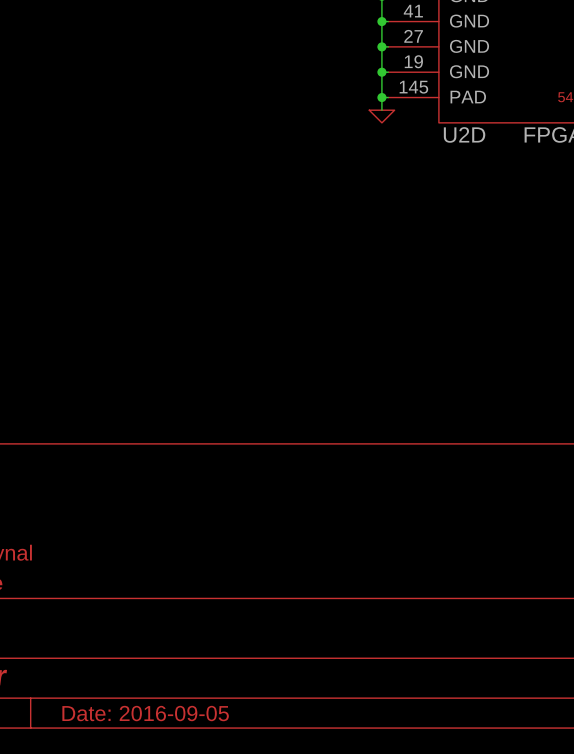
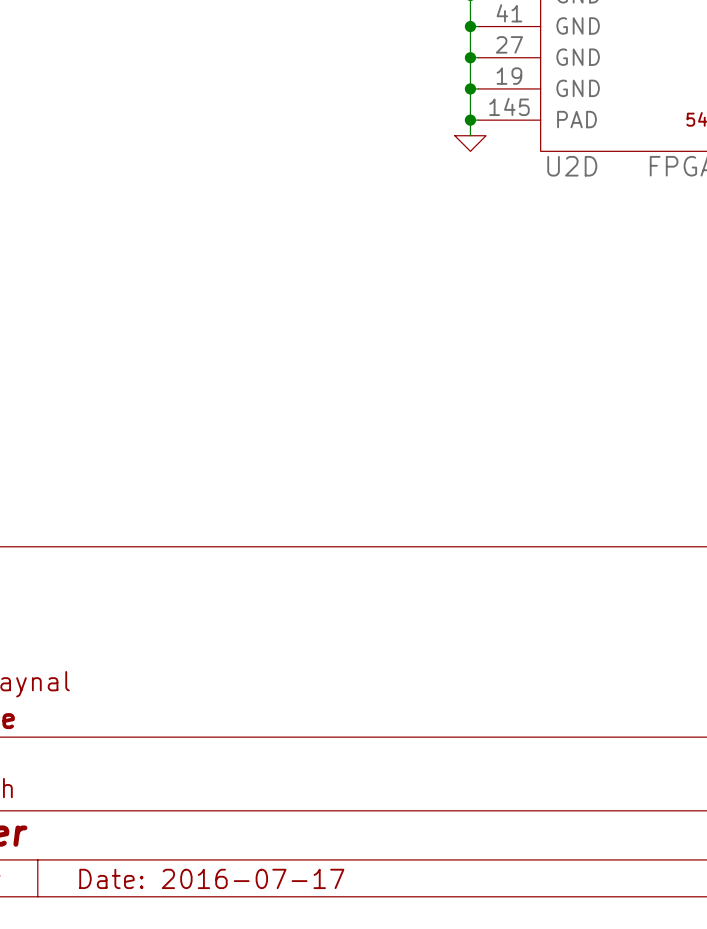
title block: Date: 2016-09-05 (145, 713) -> Date: 2016-07-17 (211, 878)

